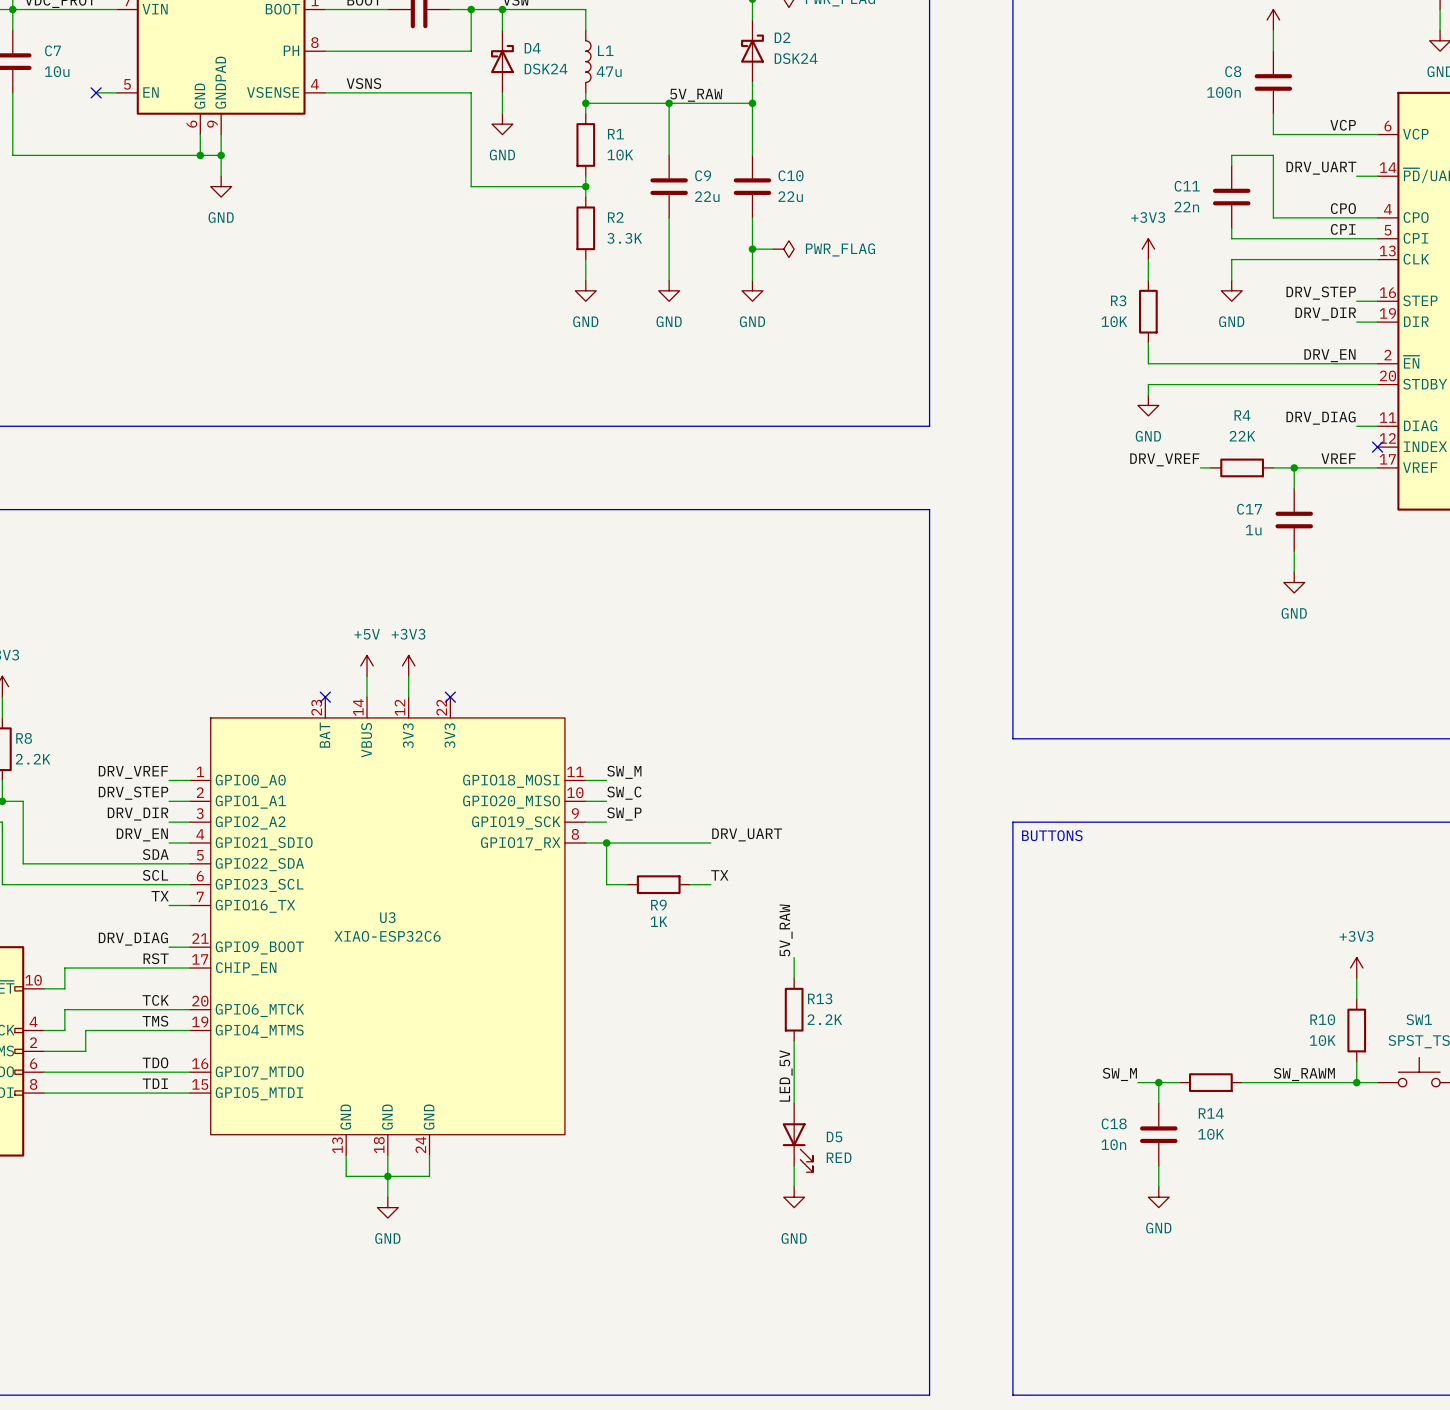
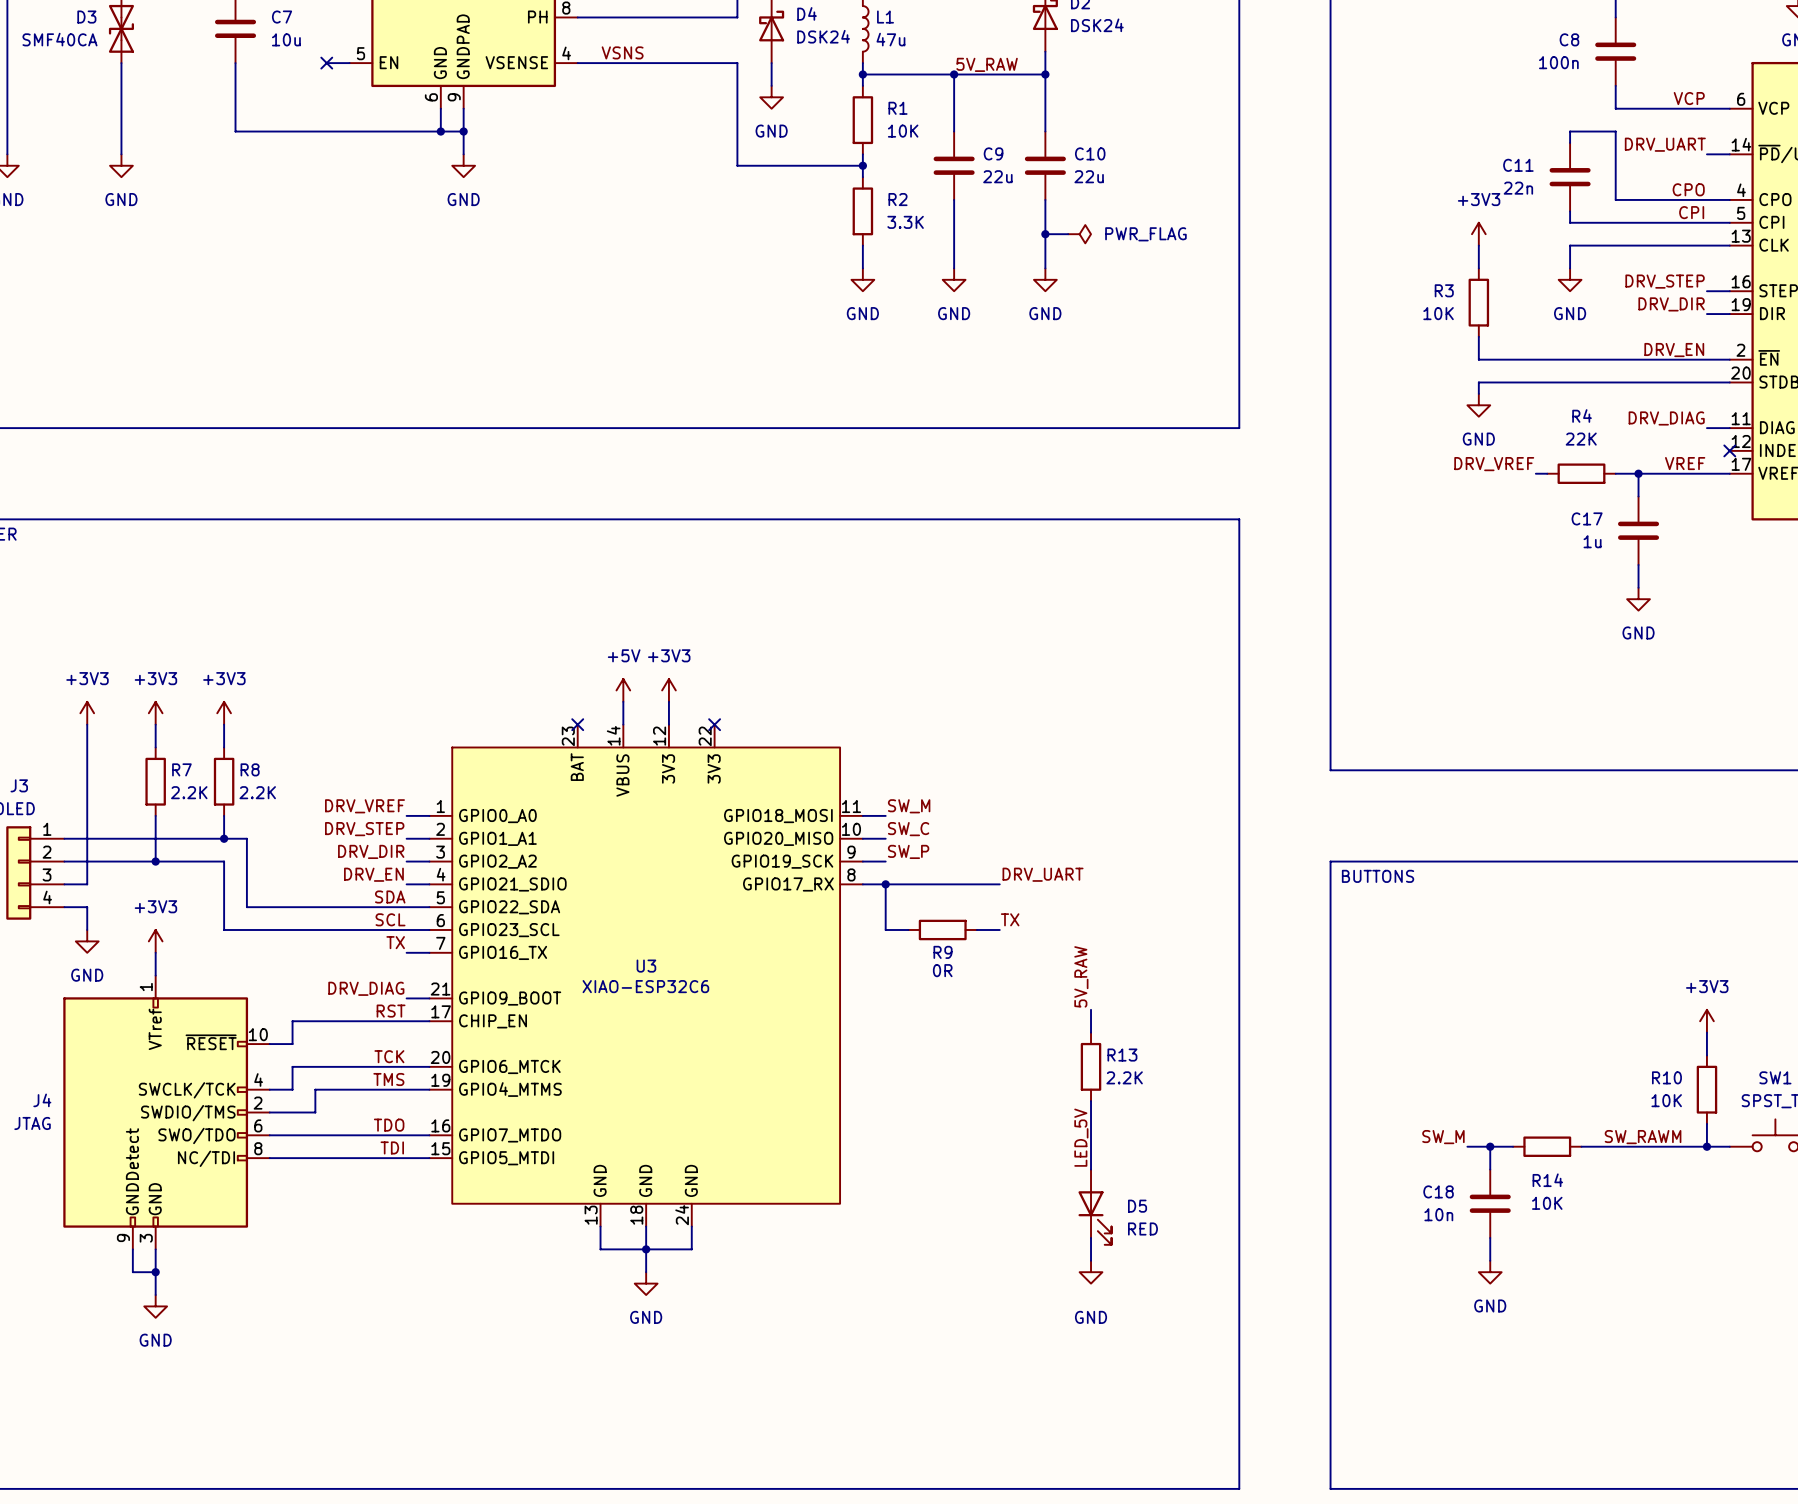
R9 value: 1K (658, 921) -> 0R (942, 970)

